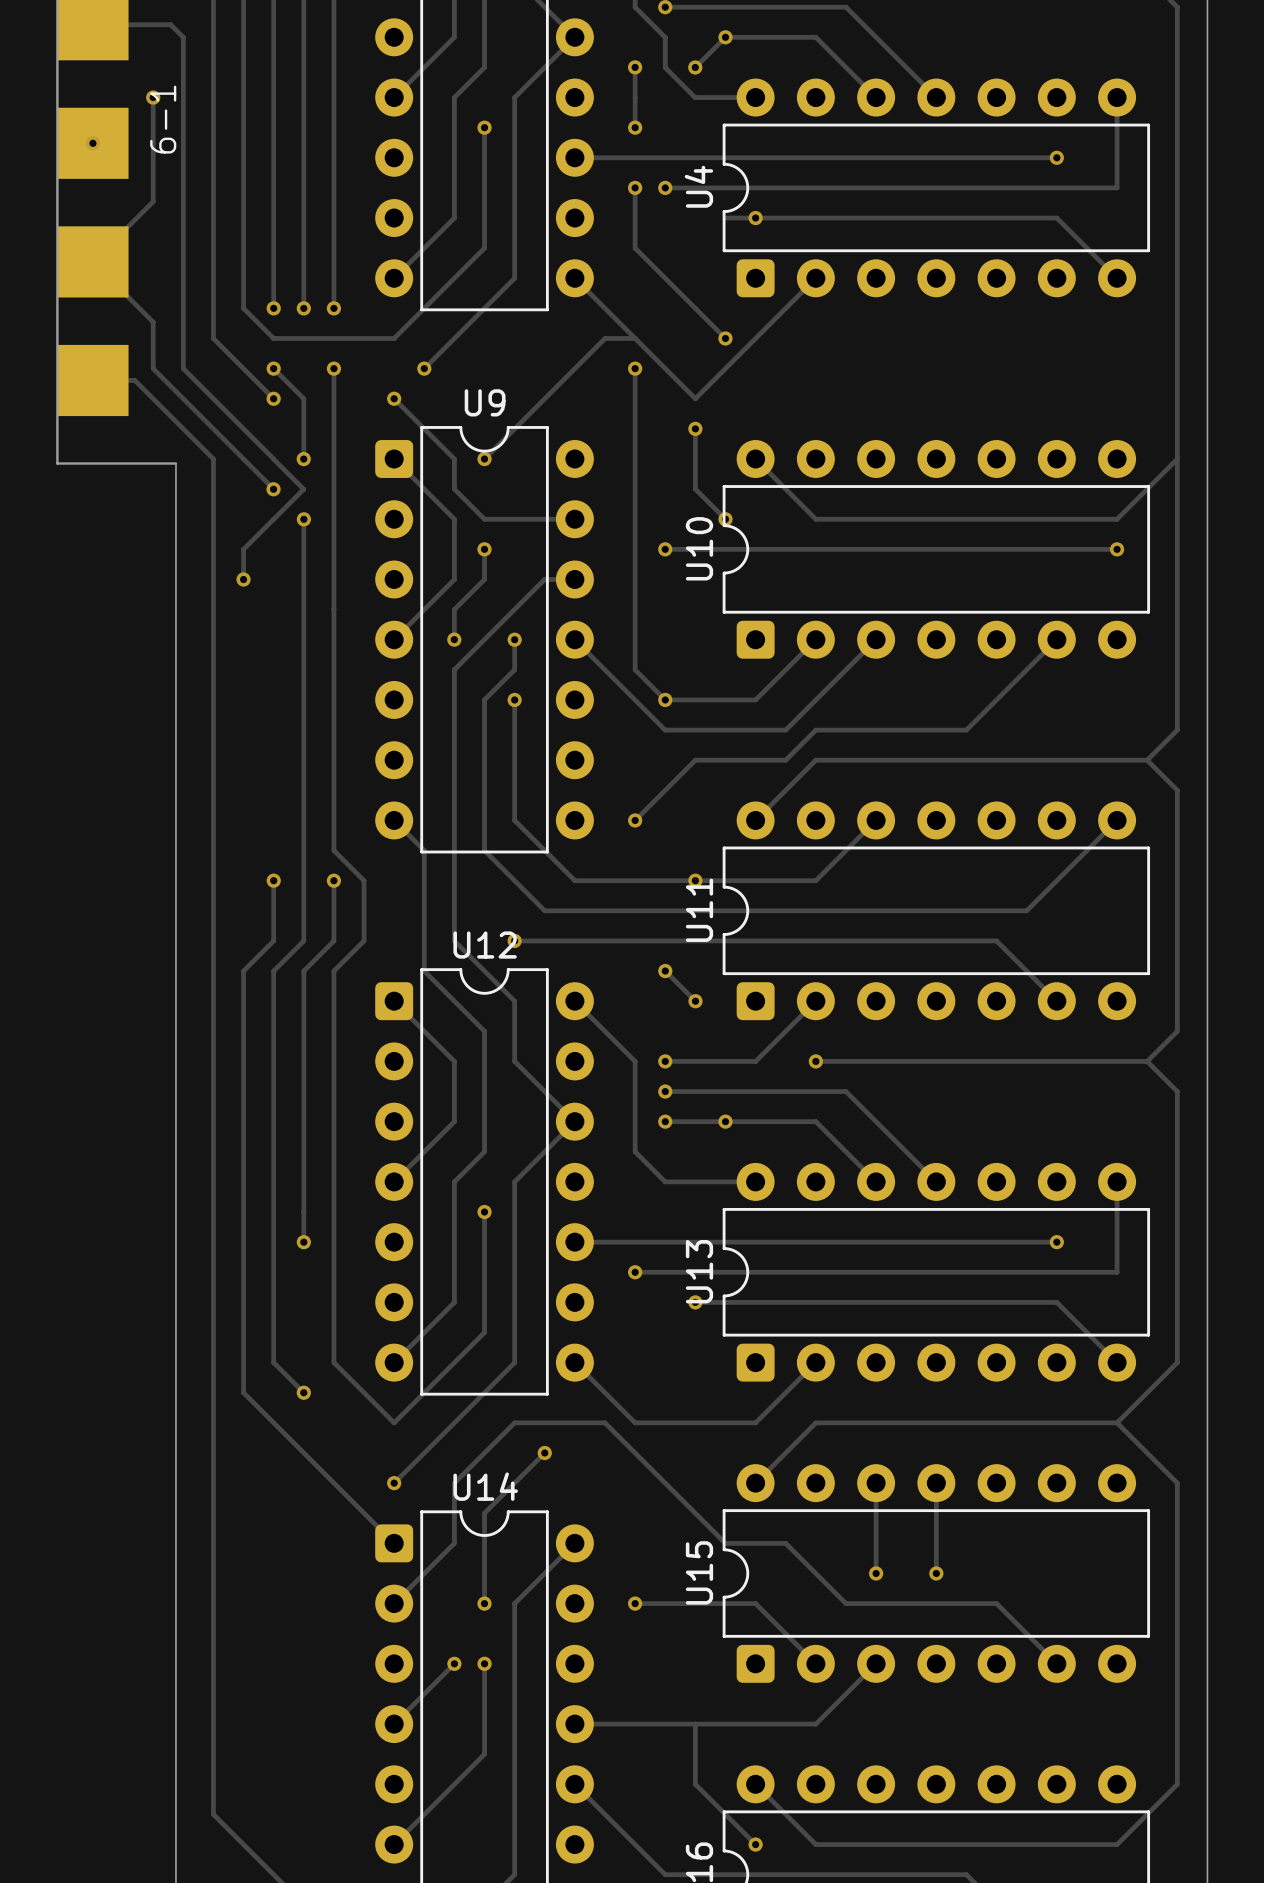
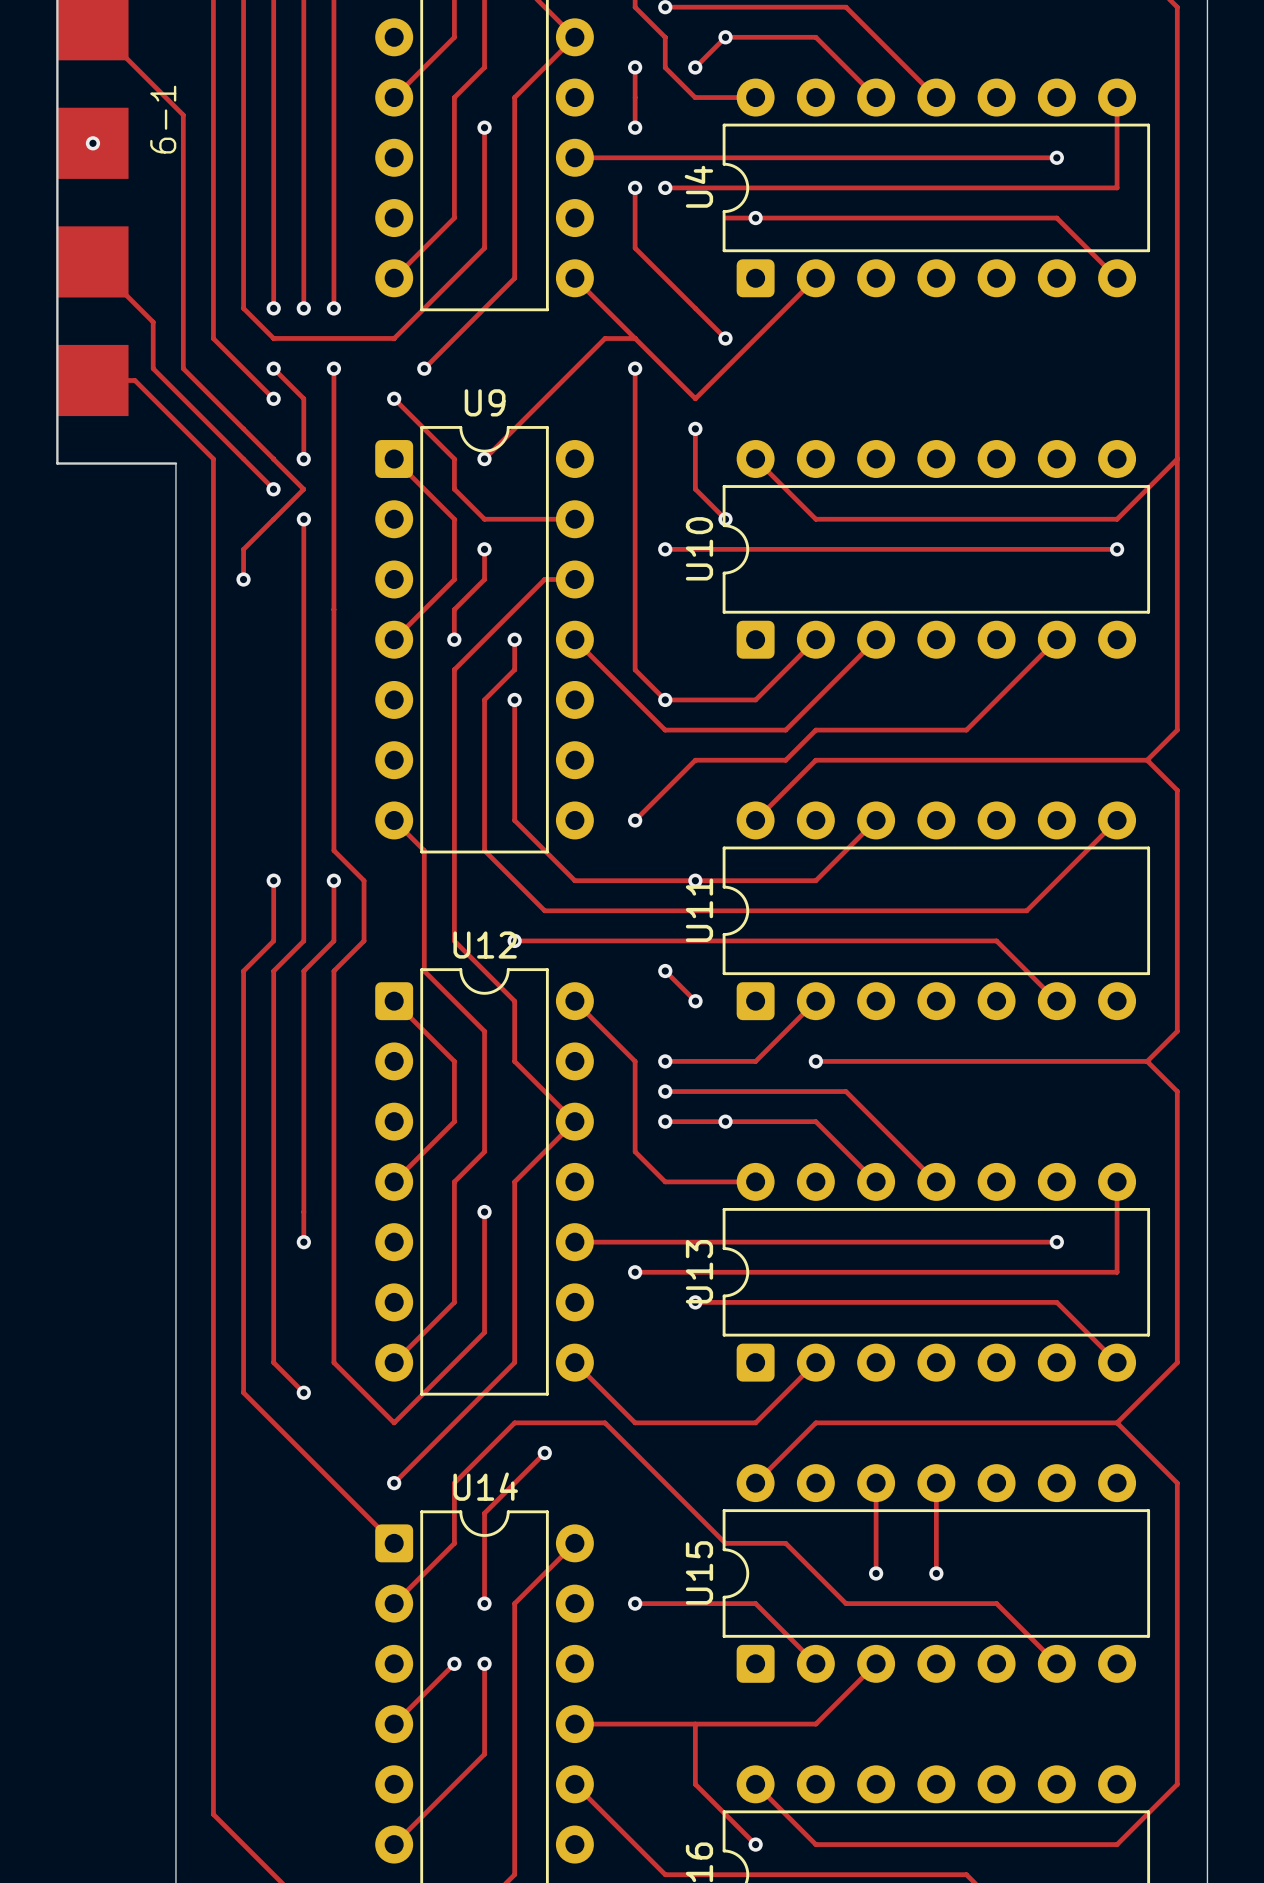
track: (92, 24) (170, 24) (183, 37) (183, 115) -> (92, 24) (183, 115)
track: (153, 97) (153, 201) (92, 261) -> none
via: (153, 97) -> none

